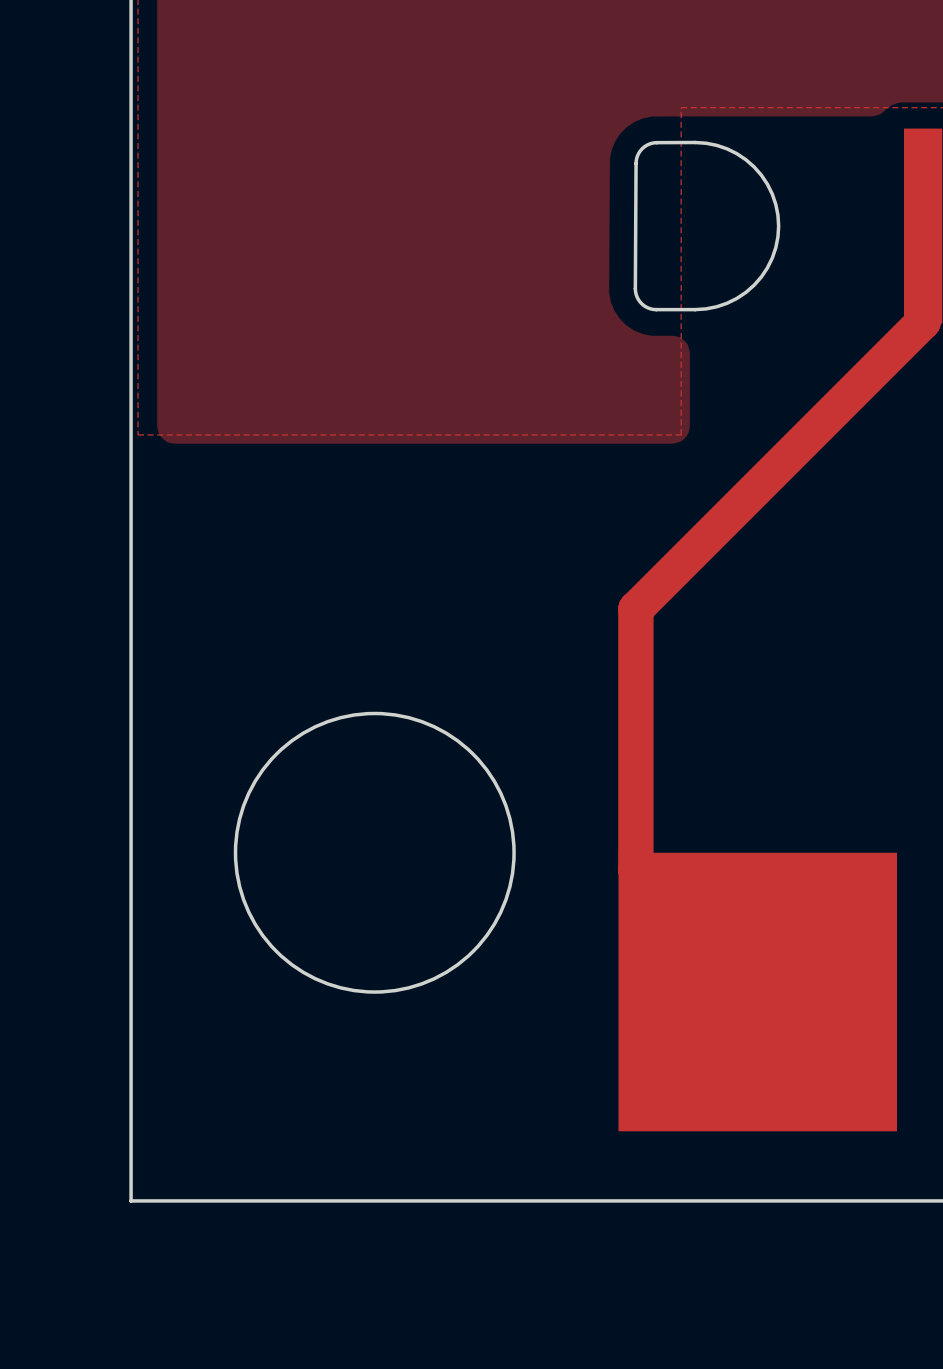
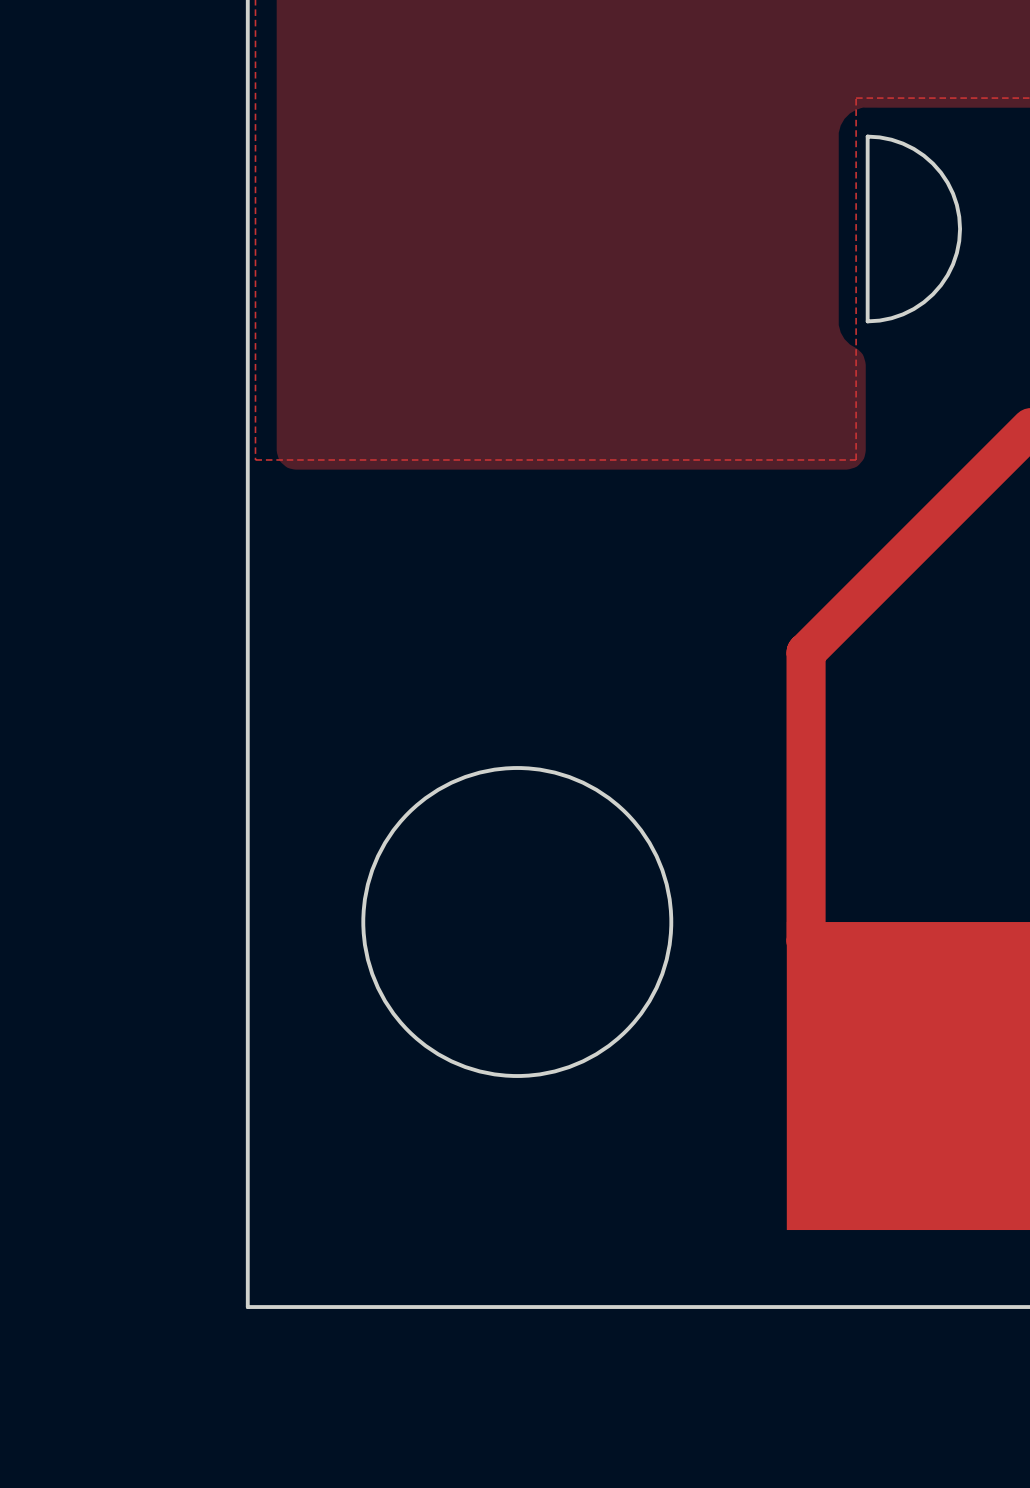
board edge: (695, 142) (651, 143) (642, 148) (636, 158) (635, 291) (641, 303) (650, 308) (706, 308) (727, 303) (754, 285) (767, 267) (775, 247) (777, 215) (772, 194) (761, 175) (736, 153) (716, 145) (695, 142) -> (867, 136) (879, 137) (903, 143) (923, 155) (933, 163) (947, 182) (953, 193) (959, 216) (960, 228) (959, 241) (953, 264) (947, 275) (933, 294) (923, 302) (903, 314) (891, 318) (867, 321) (867, 136)

